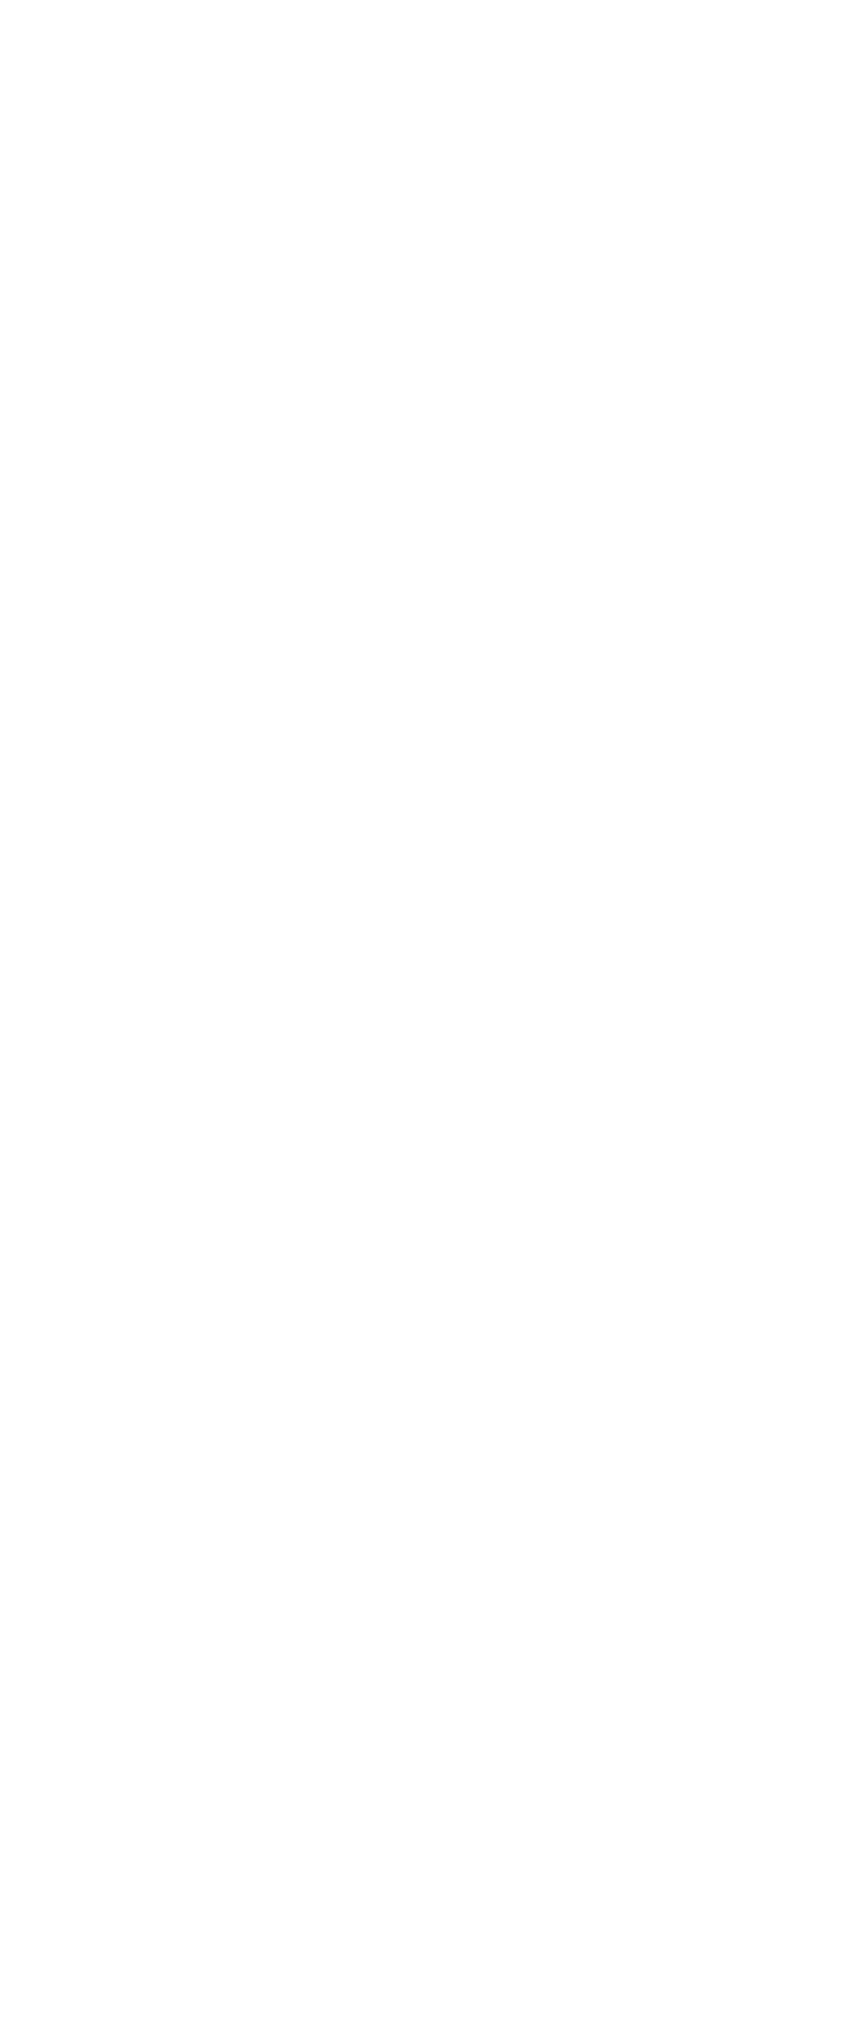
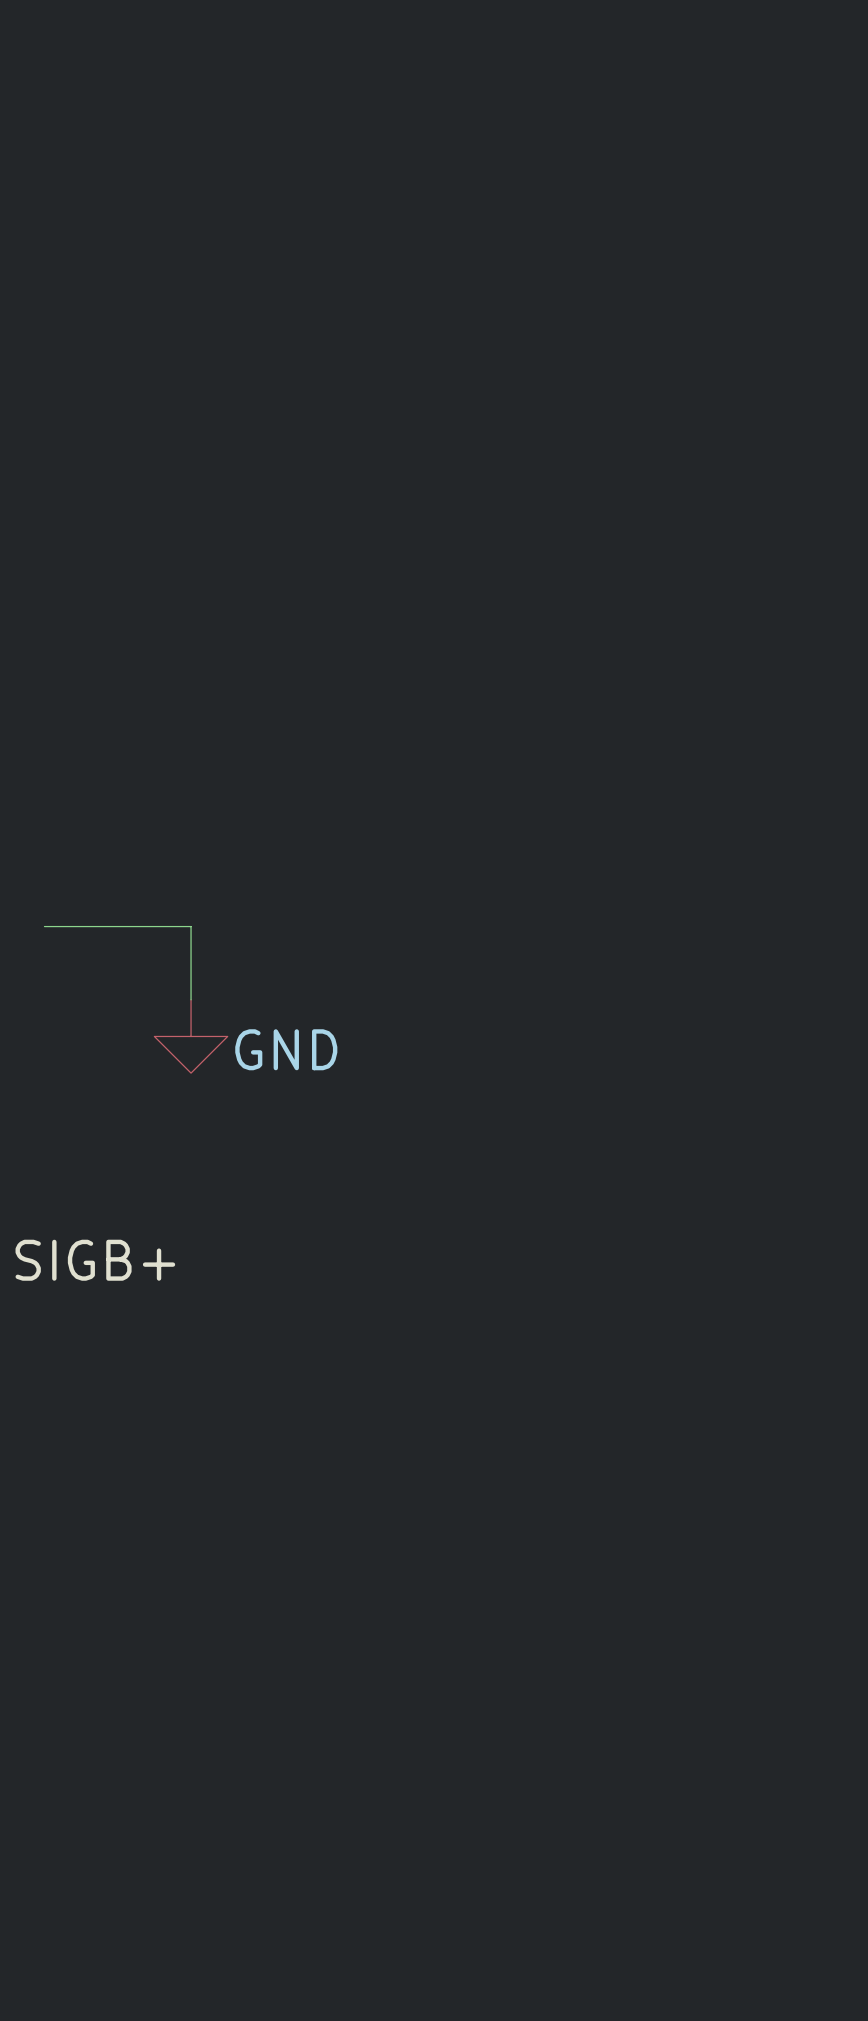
wire: none -> (44, 926) (191, 926) (191, 999)
power symbol: none -> GND (191, 1036)
label: none -> SIGB+ (95, 1260)

